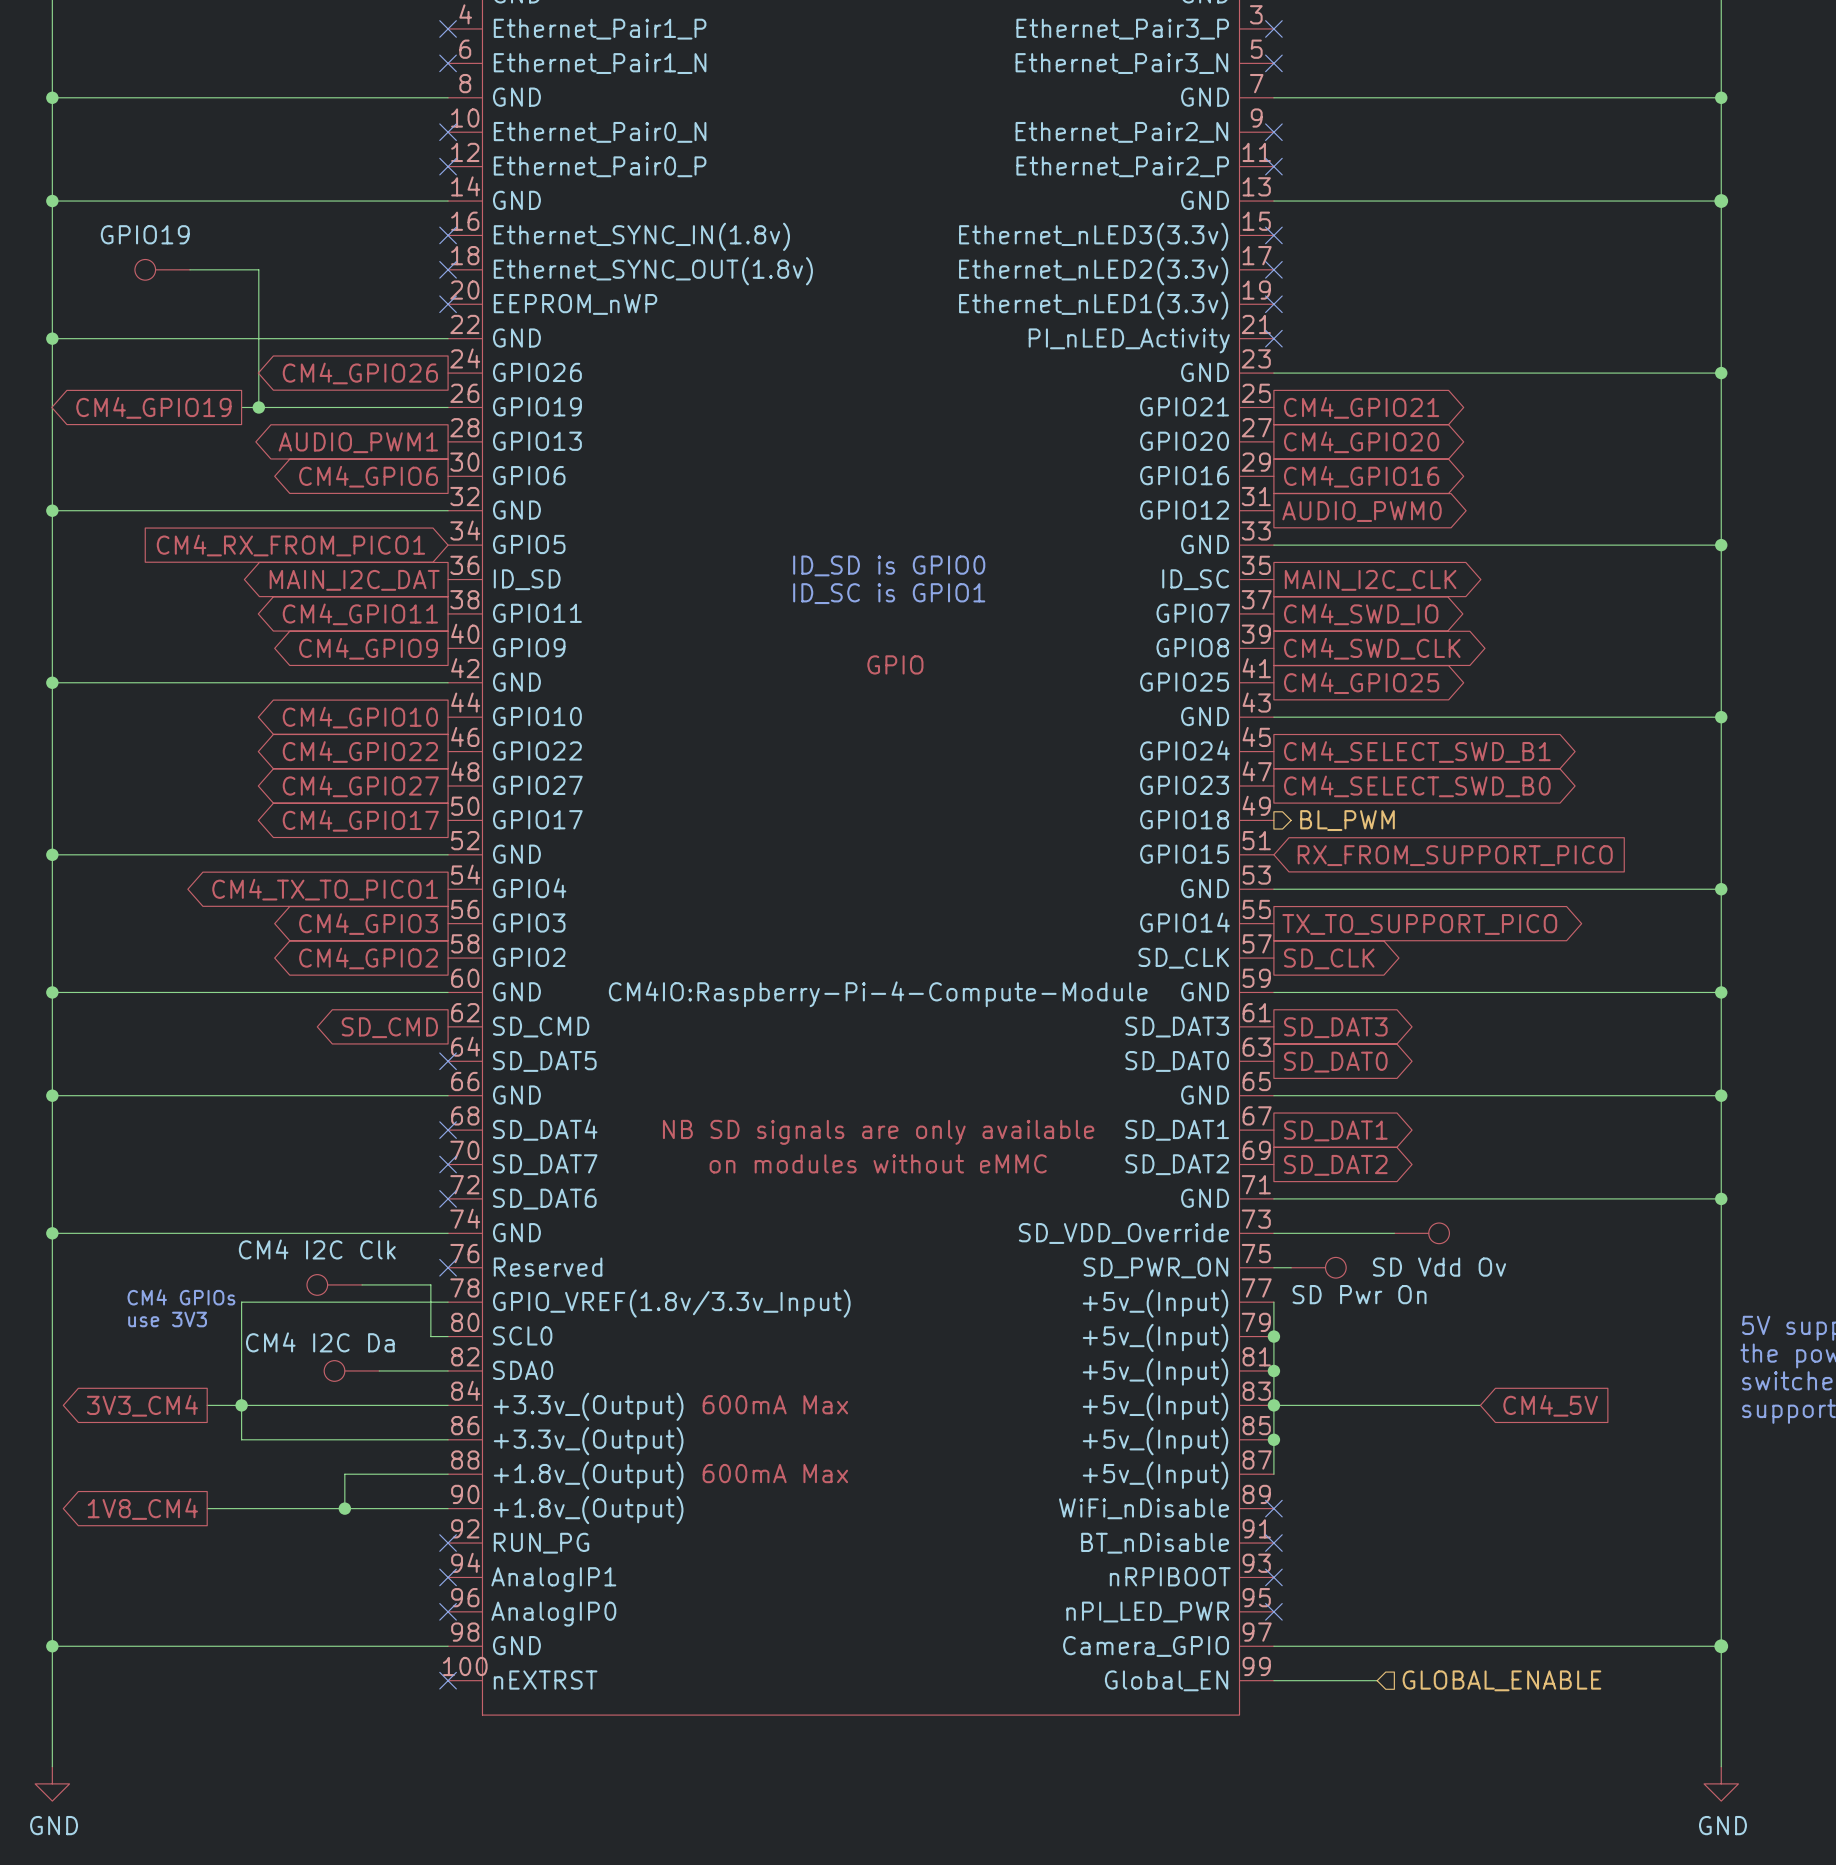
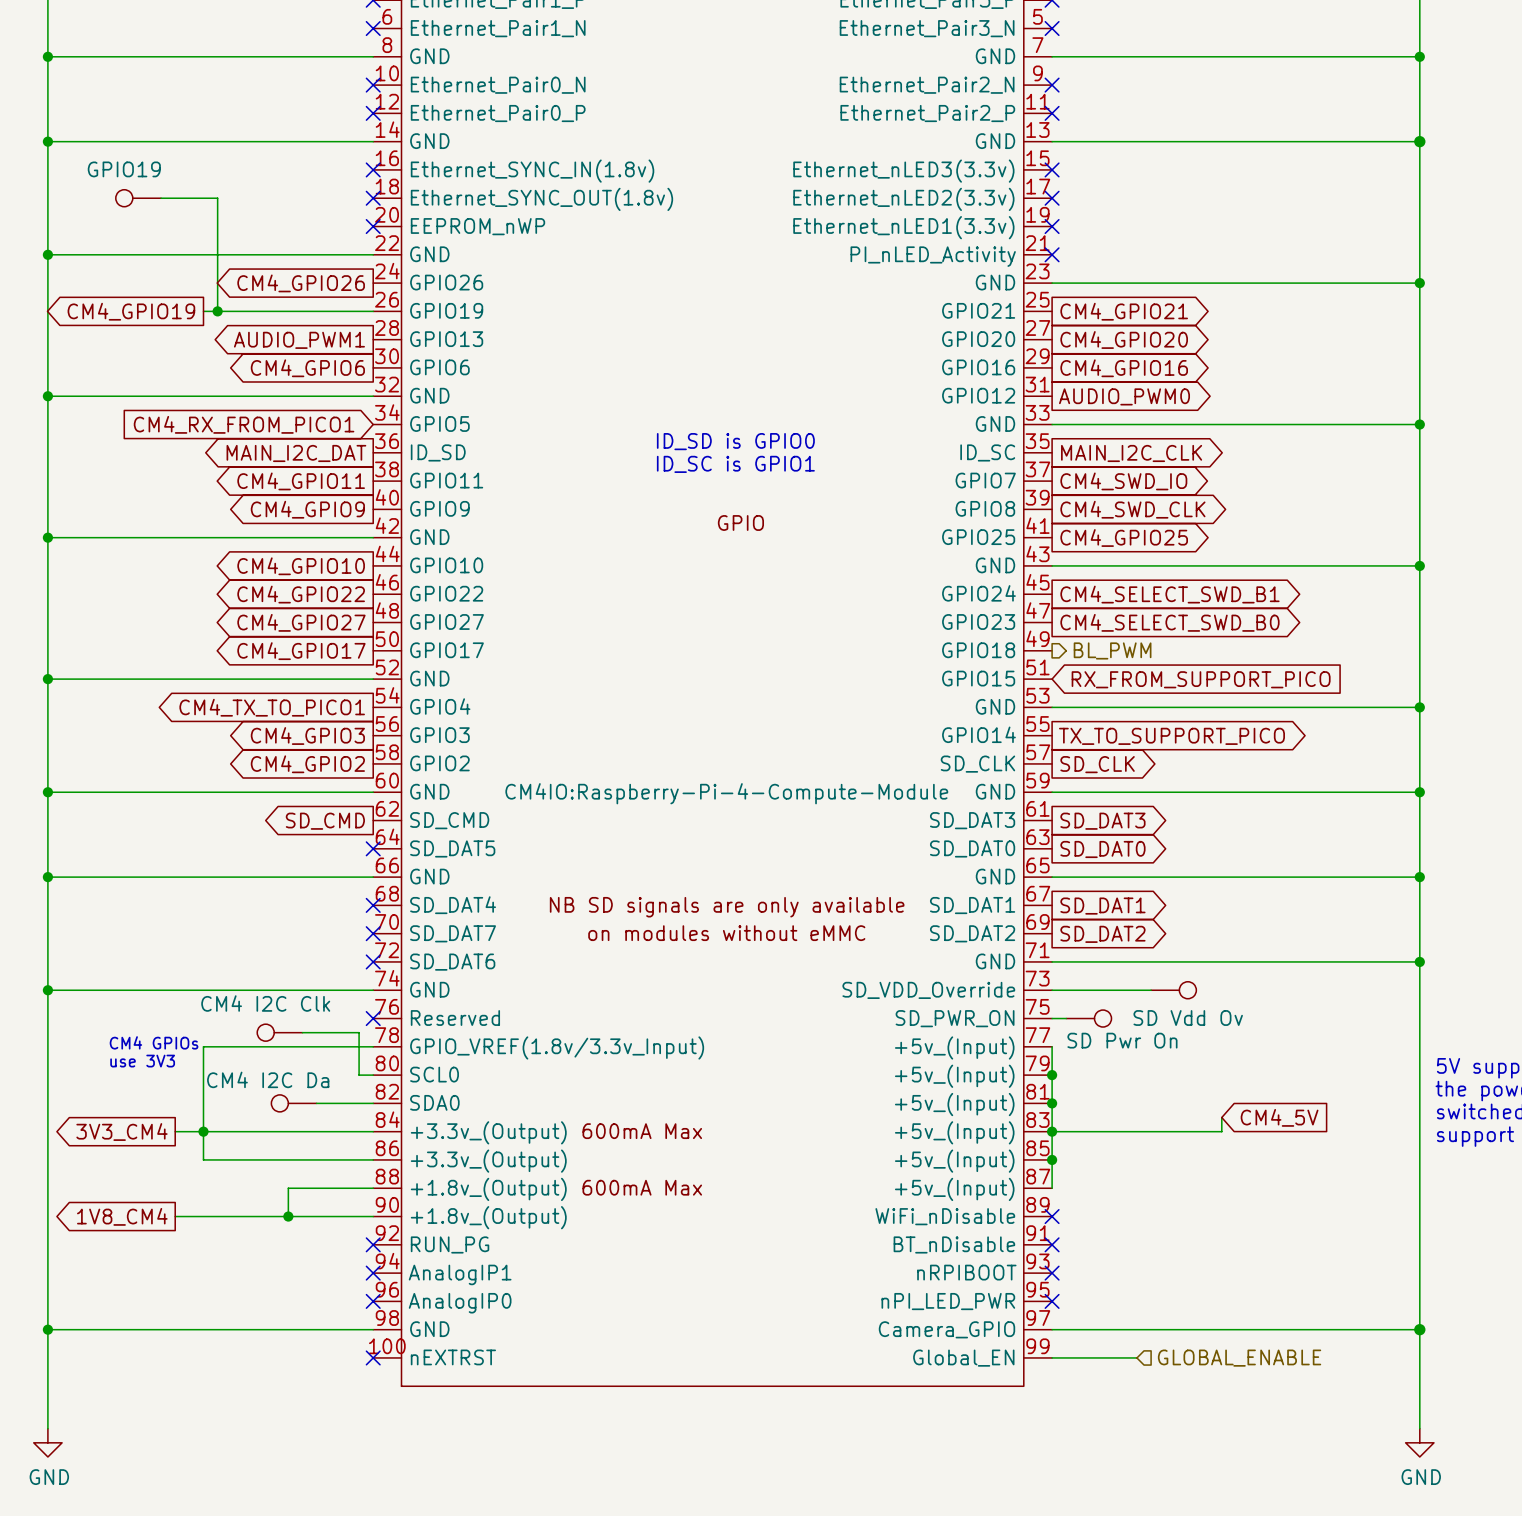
wire: none -> (1221, 1117) (1221, 1131)
global label position: CM4_5V (1550, 1405) -> CM4_5V (1279, 1117)

